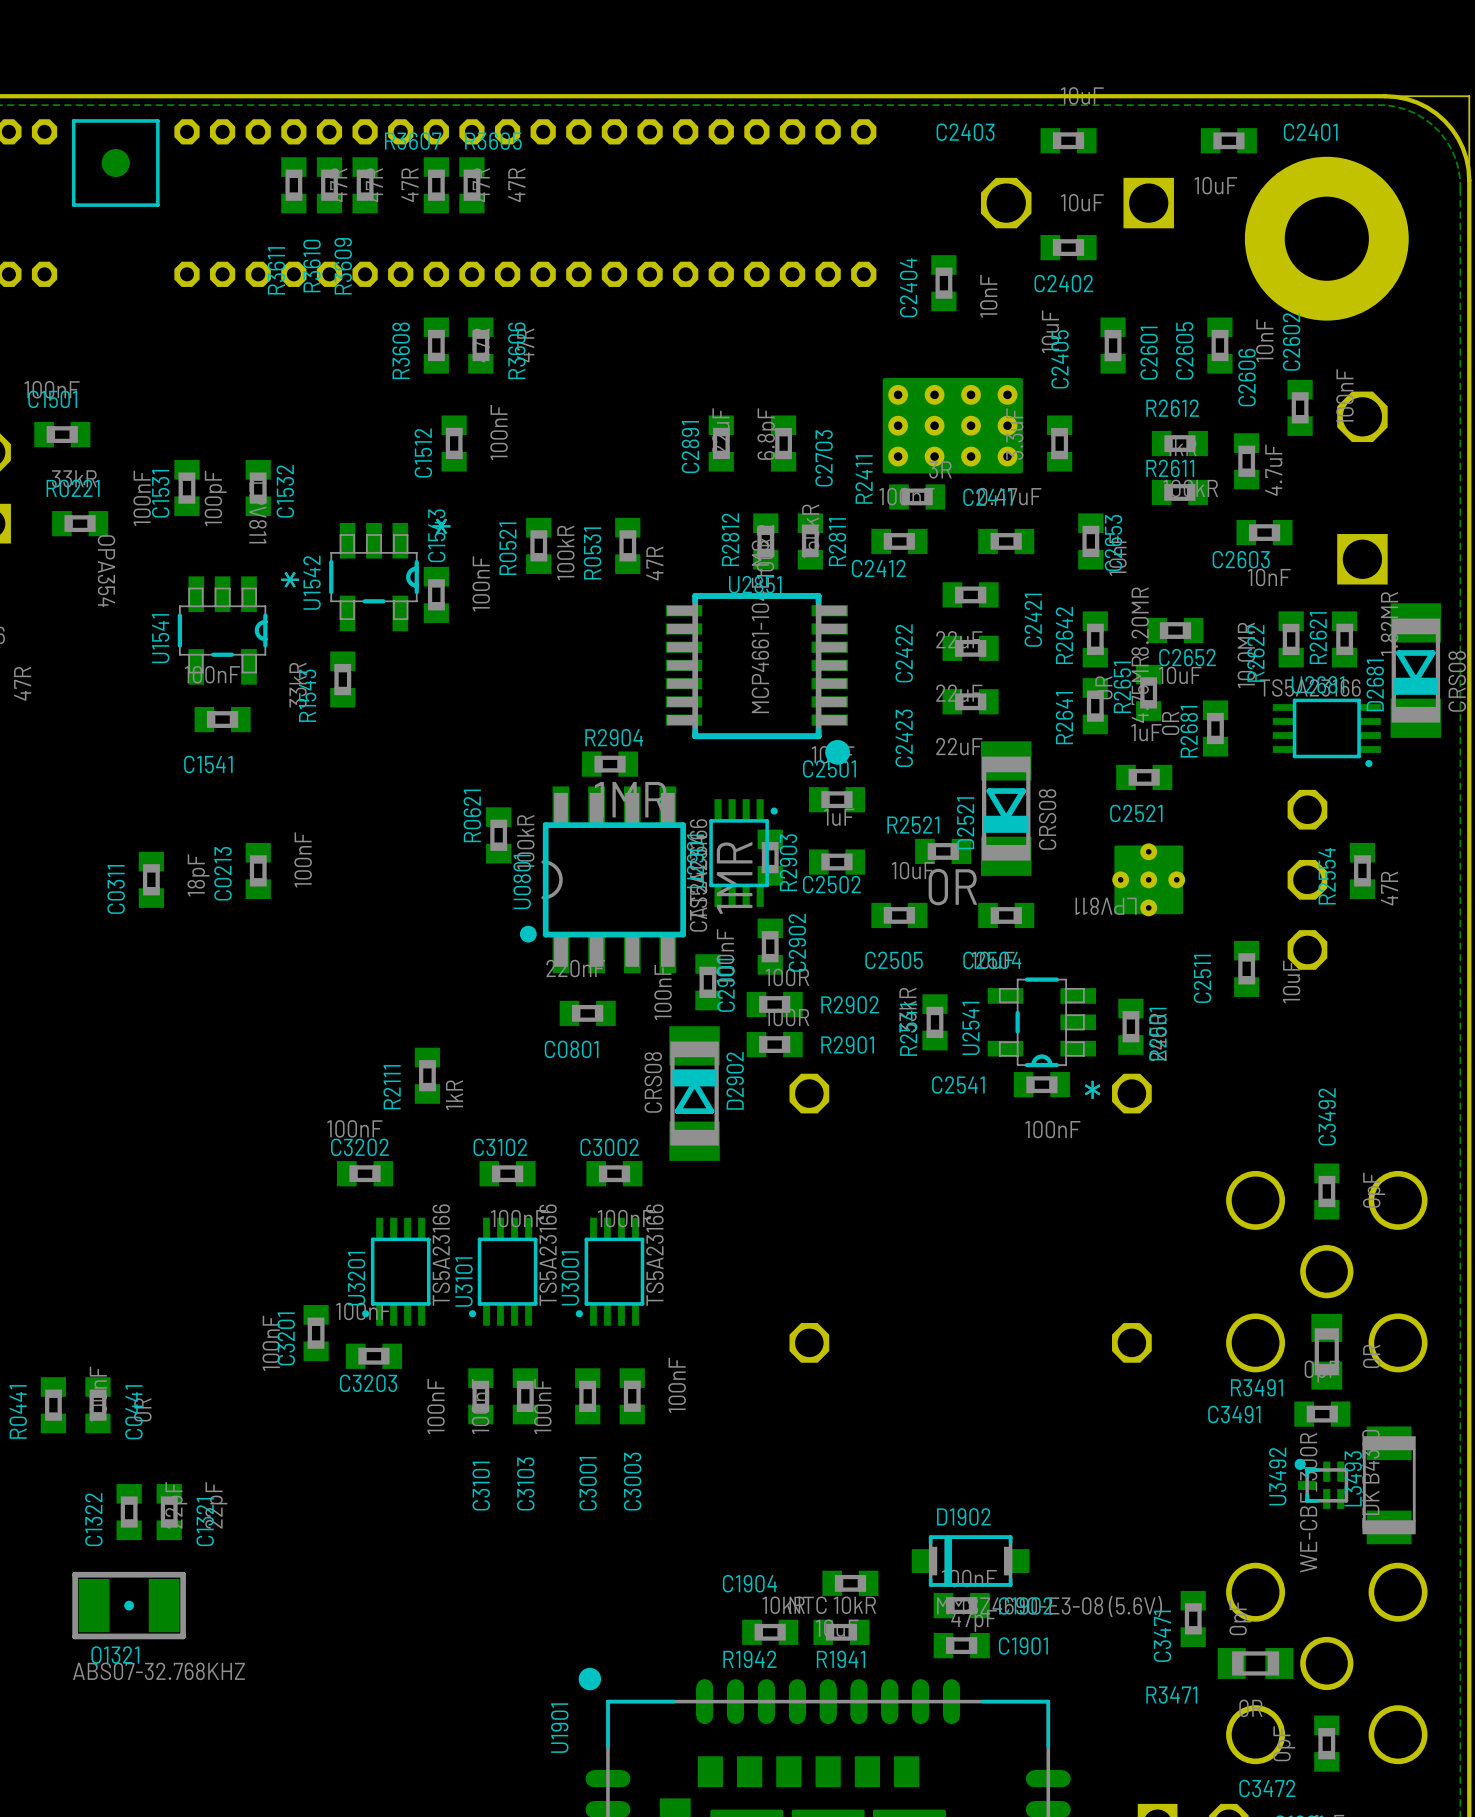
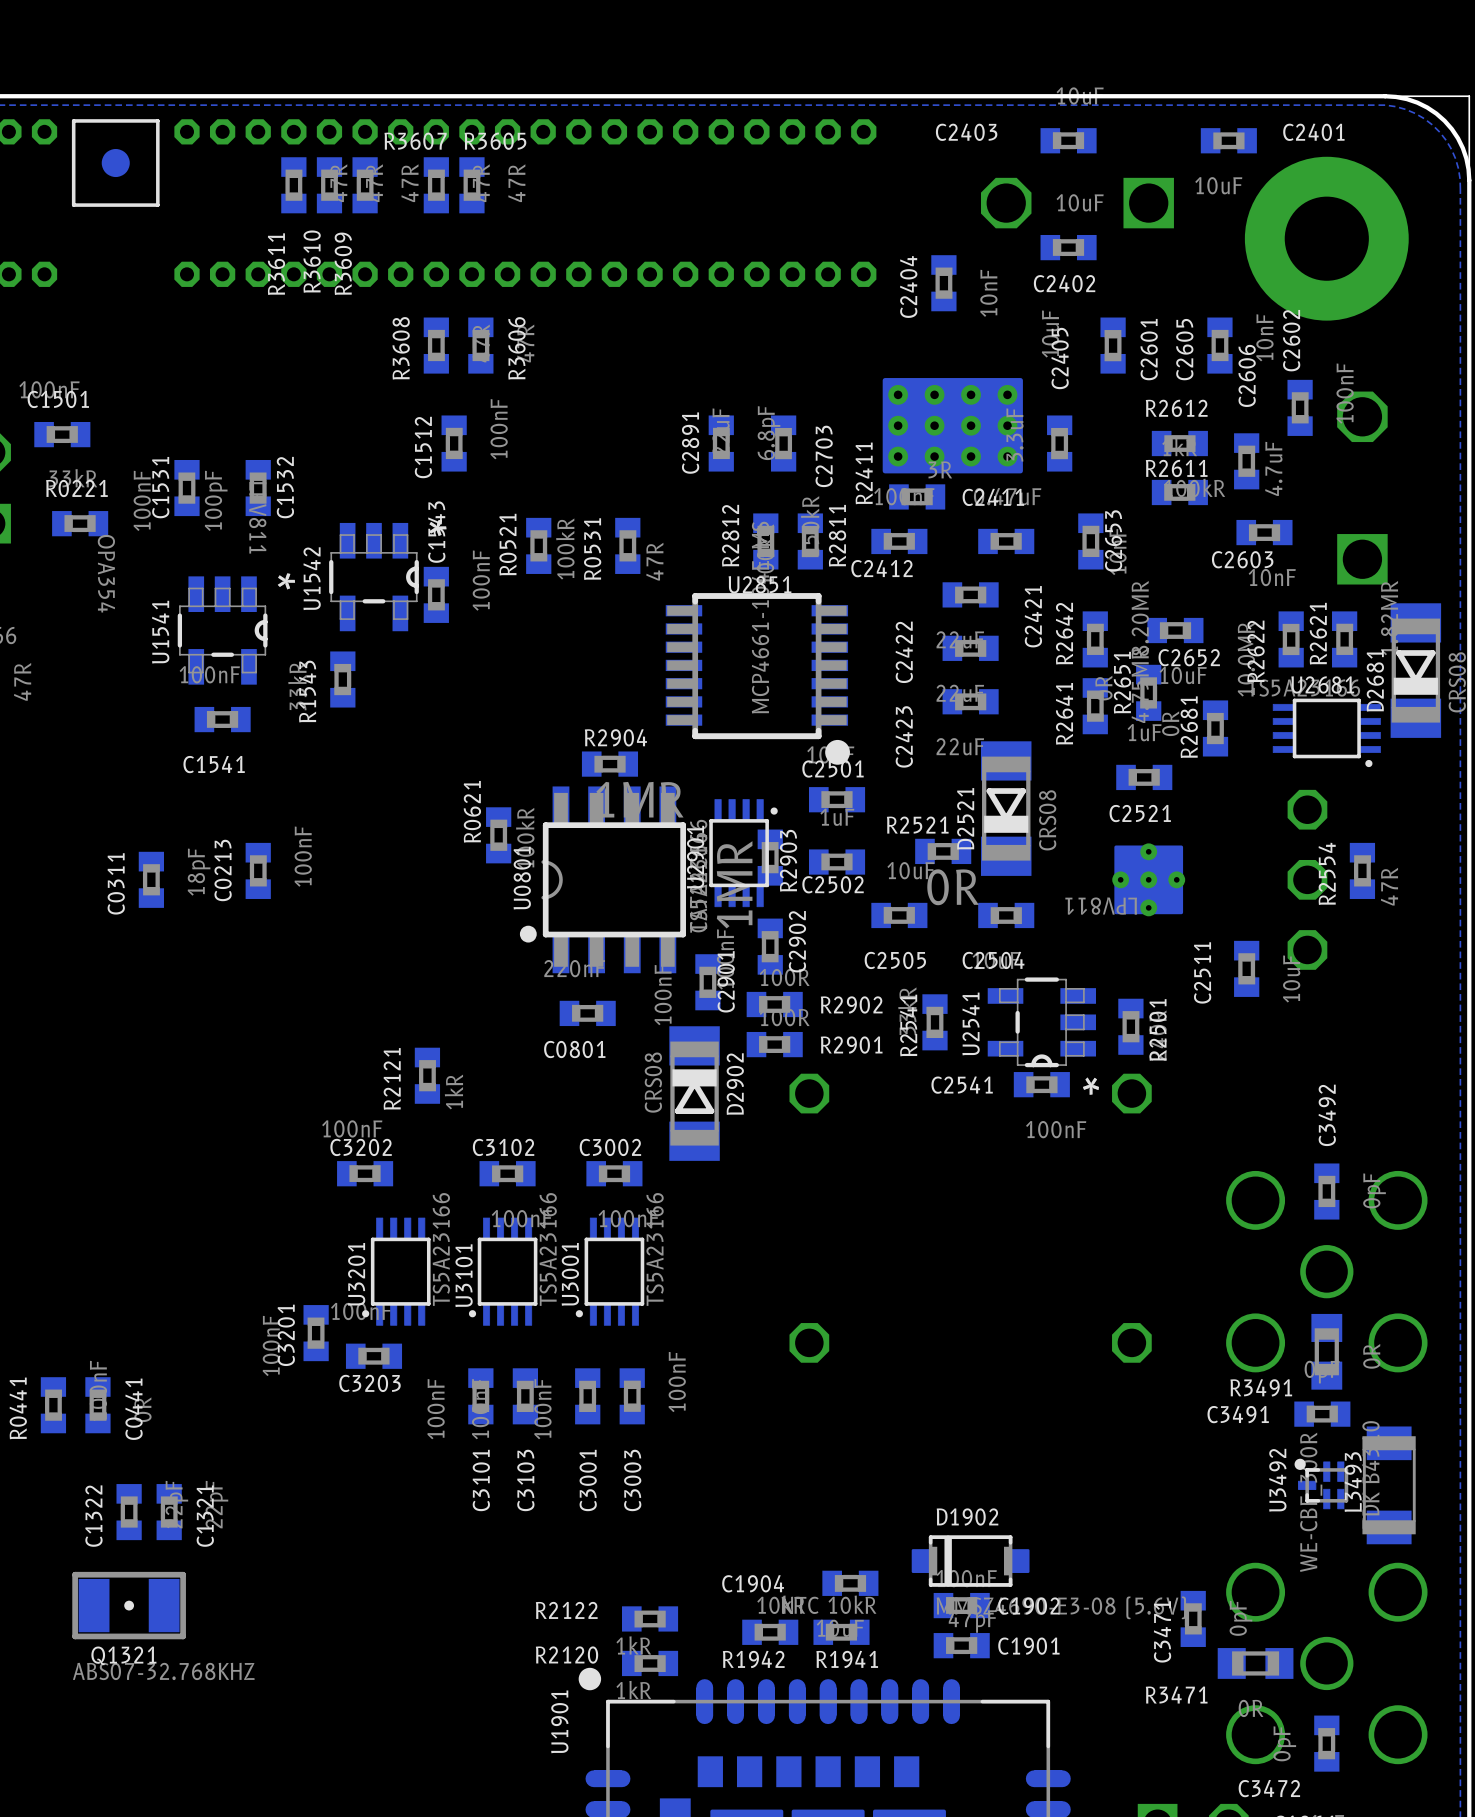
R2111 name: R2111 (392, 1087) -> R2121 (392, 1078)
R2122: none -> 1kR (650, 1618)
R2120: none -> 1kR (650, 1663)

